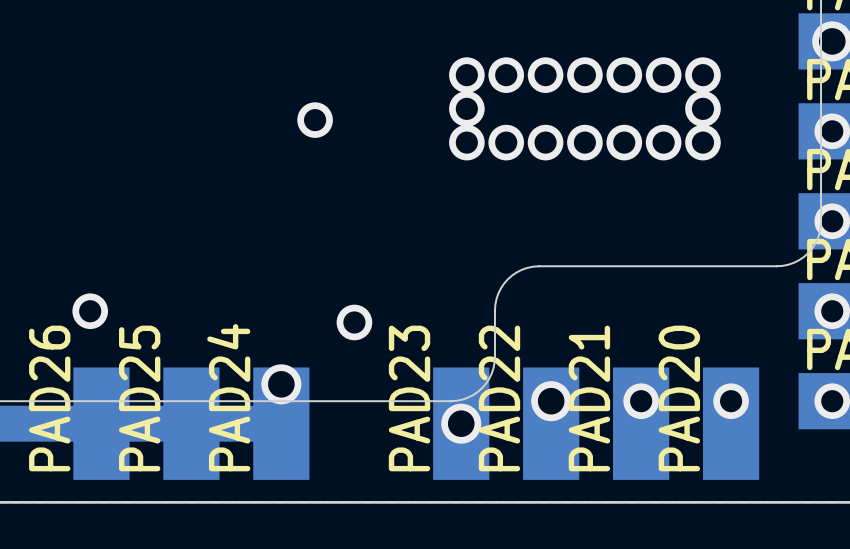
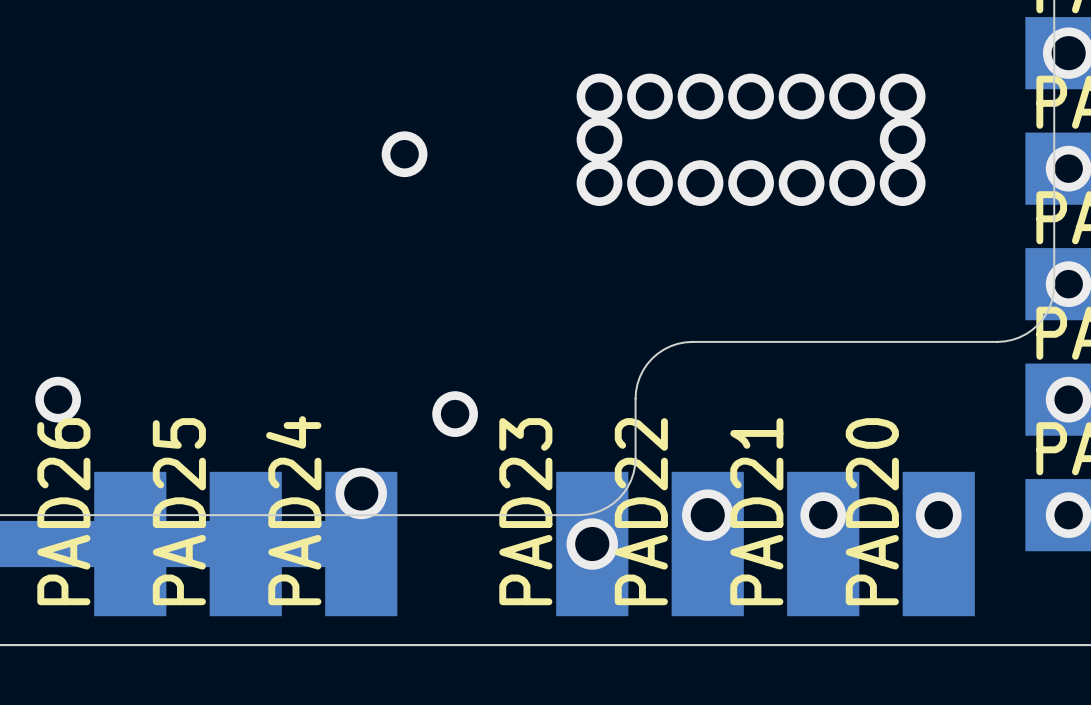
via position: (90, 311) -> (58, 399)

